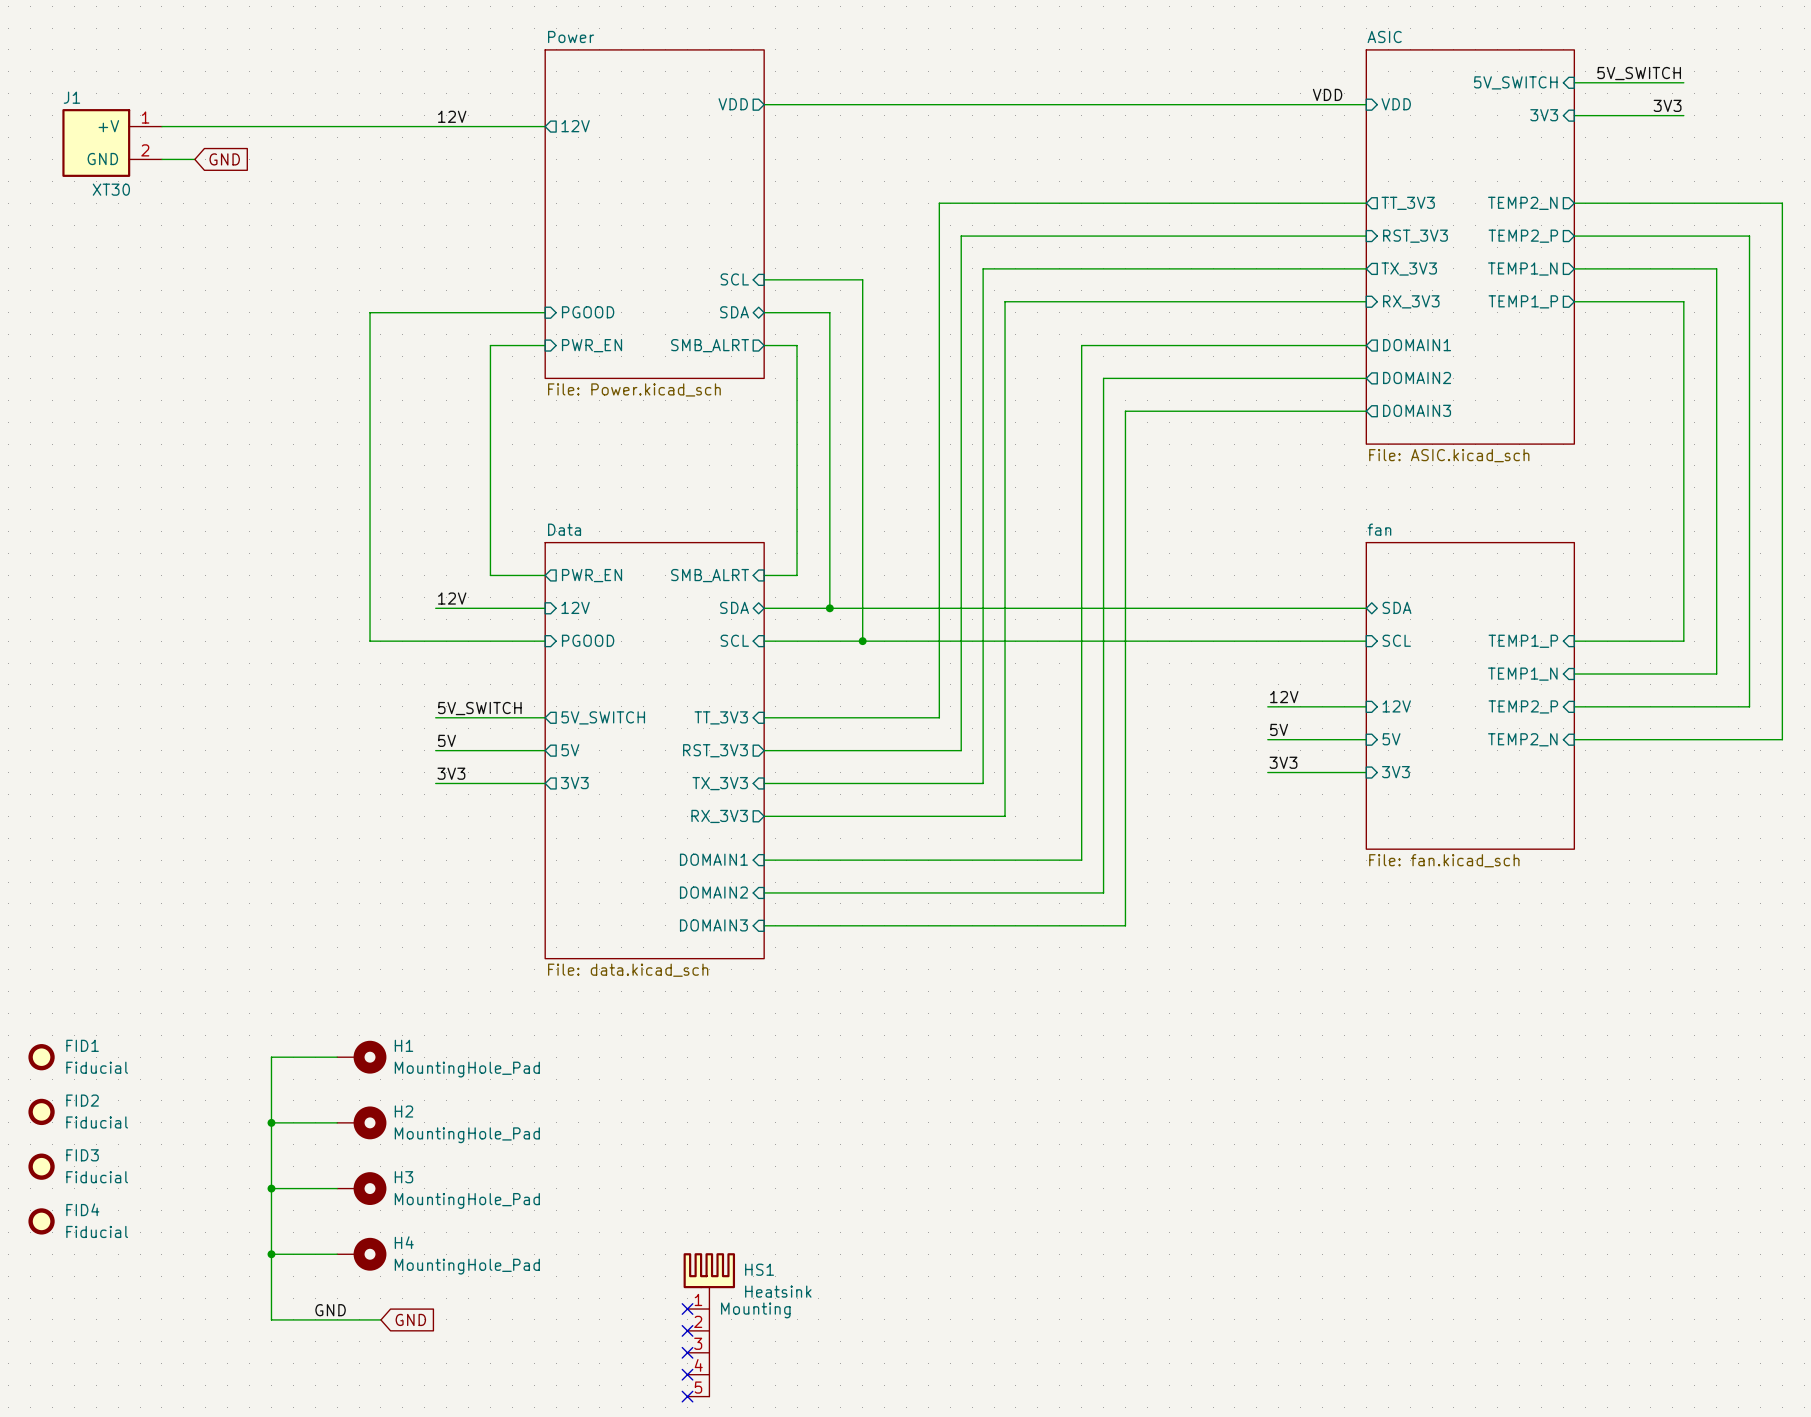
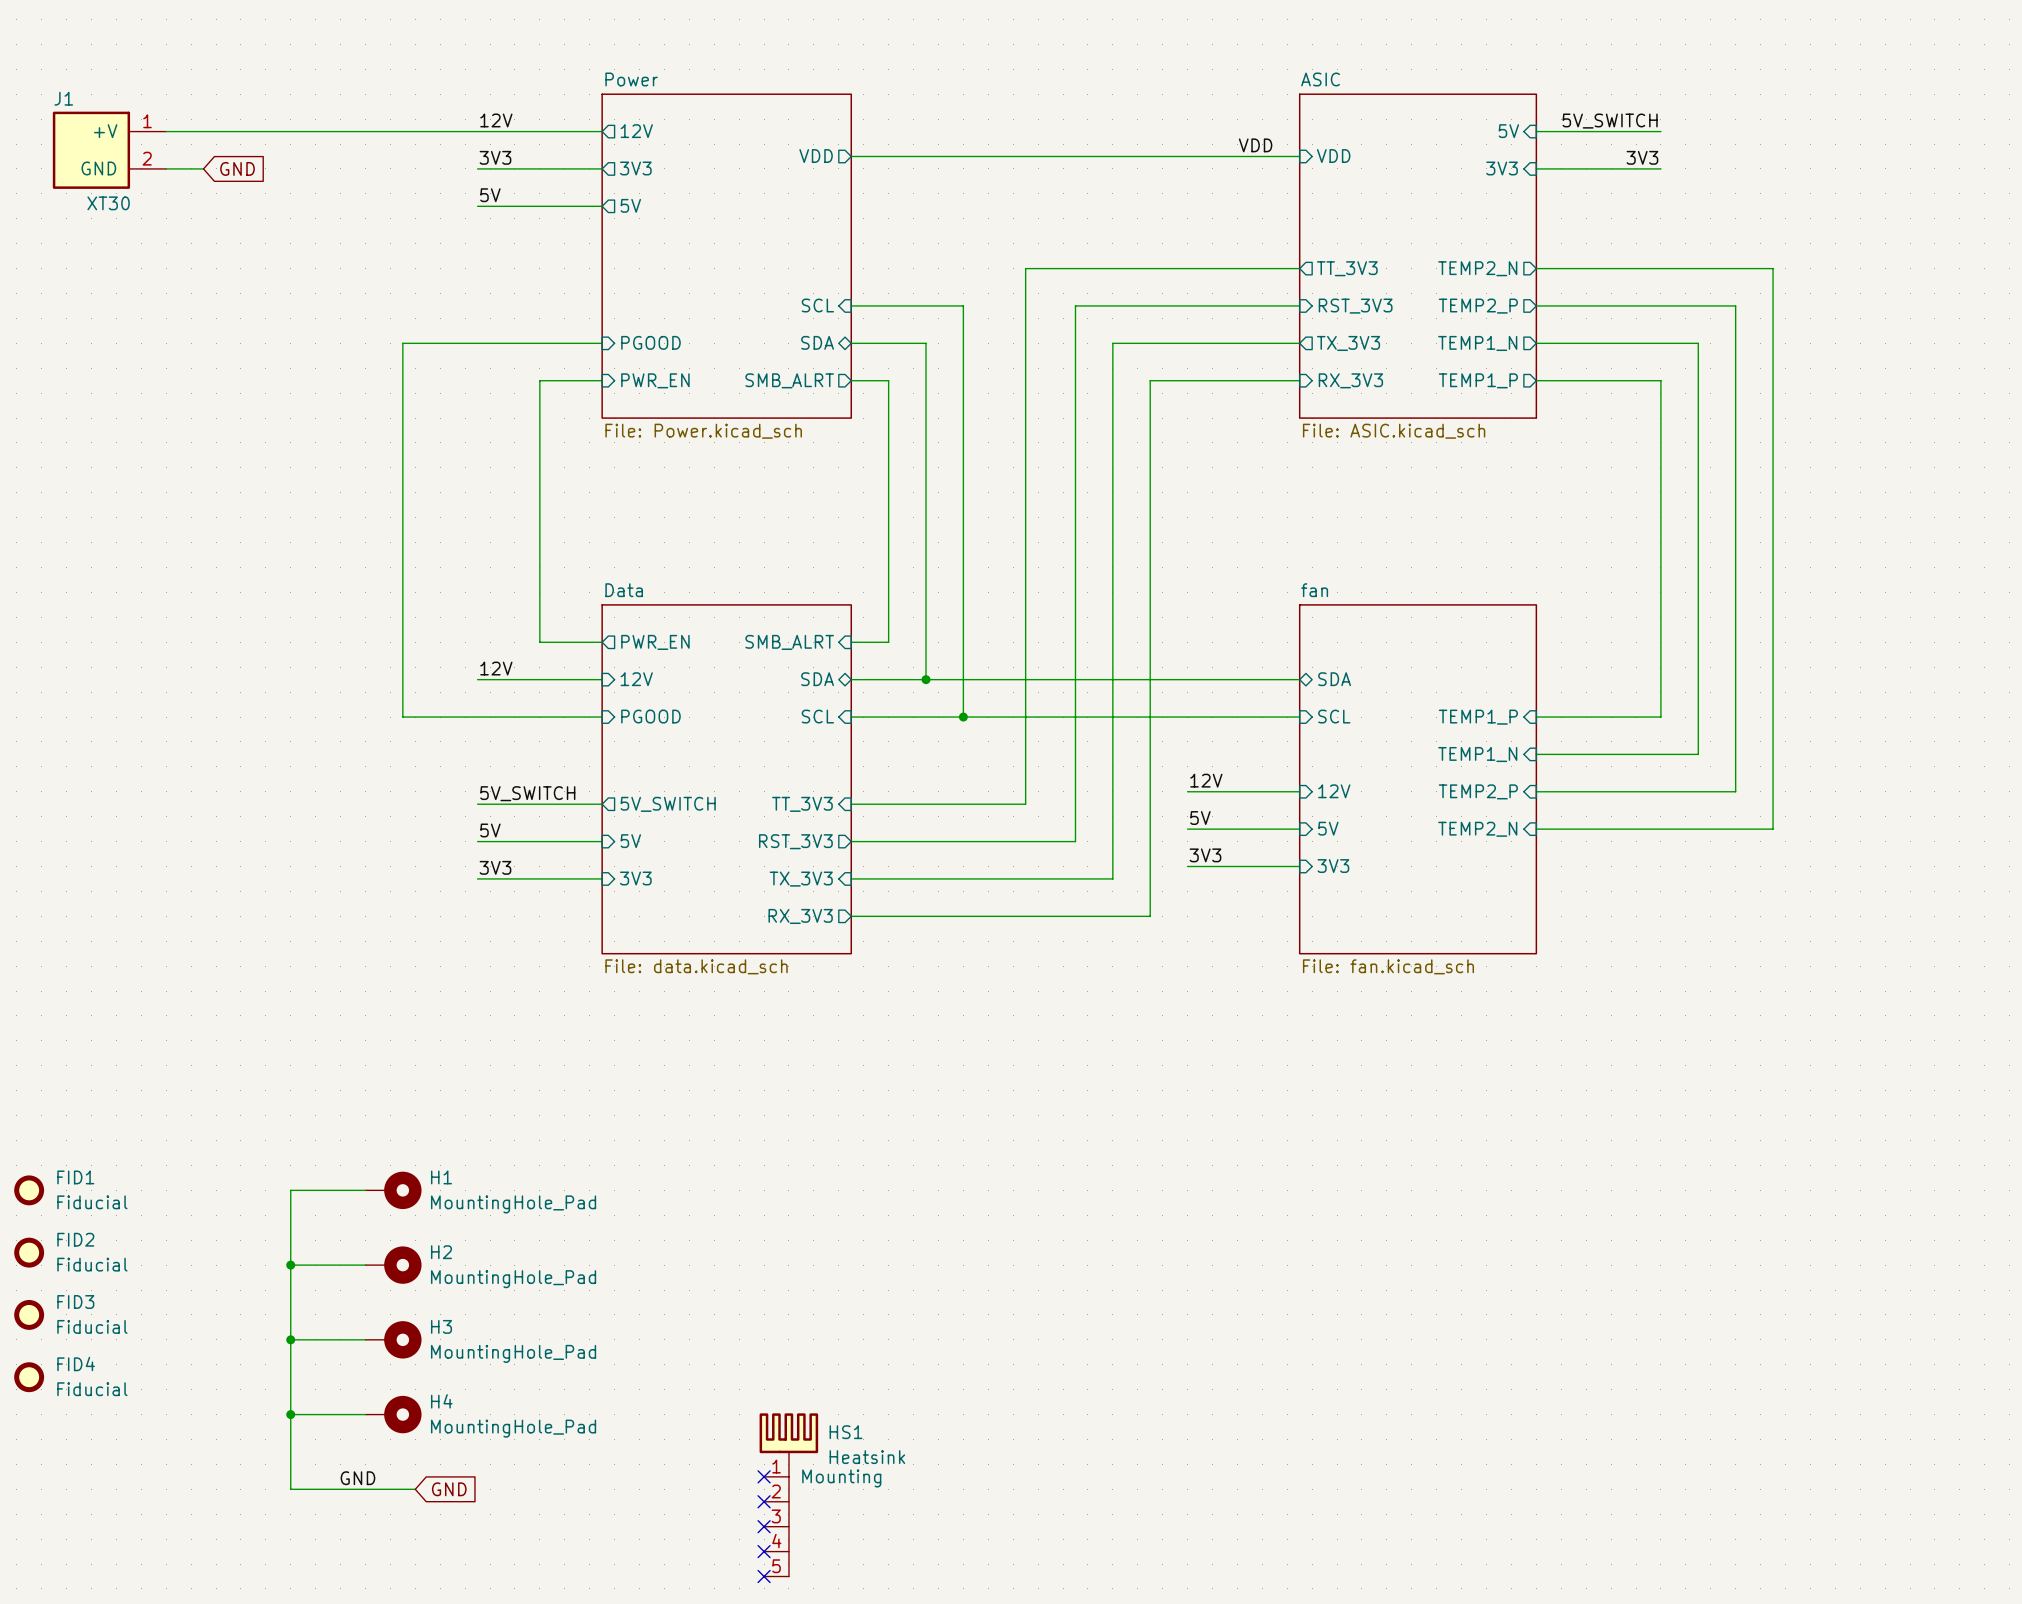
label position: 5V_SWITCH (1639, 73) -> 5V_SWITCH (1610, 121)
sheet pin: 5V_SWITCH (1515, 82) -> none
wire: (1574, 82) (1683, 82) -> (1536, 131) (1660, 131)
label position: VDD (1327, 94) -> VDD (1255, 145)
sheet pin position: VDD (733, 104) -> VDD (816, 156)
wire: (764, 104) (1366, 104) -> none
sheet pin: VDD (1396, 104) -> none
label position: 3V3 (1667, 105) -> 3V3 (1642, 157)
sheet pin position: 3V3 (1544, 115) -> 3V3 (1502, 168)
wire: (1574, 115) (1683, 115) -> (1536, 168) (1660, 168)
sheet pin: none -> 5V (1508, 131)
wire: none -> (851, 156) (1299, 156)
sheet pin: none -> VDD (1333, 156)
label: none -> 3V3 (495, 157)
wire: none -> (477, 168) (602, 168)
sheet pin: none -> 3V3 (635, 168)
label: none -> 5V (490, 195)
sheet pin: none -> 5V (630, 205)
wire: none -> (477, 206) (602, 206)
wire: (1366, 203) (939, 203) (939, 717) (917, 717) -> (1299, 268) (1025, 268) (1025, 804)
sheet pin position: TT_3V3 (1408, 203) -> TT_3V3 (1347, 268)
sheet pin position: TEMP2_N (1522, 203) -> TEMP2_N (1477, 268)
wire: (1574, 203) (1782, 203) (1782, 739) (1574, 739) -> none
sheet Power: File: Power.kicad_sch (654, 214) -> none
sheet Power: none -> File: Power.kicad_sch (726, 256)
sheet ASIC: none -> File: ASIC.kicad_sch (1418, 256)
wire: (1366, 236) (961, 236) (961, 279) -> (1299, 305) (1075, 305)
sheet pin position: RST_3V3 (1415, 236) -> RST_3V3 (1355, 306)
sheet pin position: TEMP2_P (1523, 236) -> TEMP2_P (1478, 306)
wire: (1574, 236) (1749, 236) (1749, 706) (1574, 706) -> none
sheet ASIC: File: ASIC.kicad_sch (1470, 247) -> none
wire: (1366, 268) (983, 268) (983, 783) -> (1299, 343) (1112, 343) (1112, 878) (1100, 878)
wire: (1574, 268) (1716, 268) (1716, 673) (1574, 673) -> none
sheet pin position: TX_3V3 (1409, 269) -> TX_3V3 (1348, 343)
sheet pin: TEMP1_N (1522, 269) -> none
wire: (1366, 301) (1005, 301) (1005, 816) -> none
sheet pin position: RX_3V3 (1411, 301) -> RX_3V3 (1350, 380)
sheet pin: TEMP1_P (1523, 301) -> none
wire: (1574, 301) (1683, 301) (1683, 641) (1574, 641) -> none
sheet pin: none -> TEMP1_N (1477, 343)
wire: none -> (1536, 343) (1698, 343) (1698, 754) (1536, 754)
wire: (1081, 345) (1081, 860) (764, 860) -> (1212, 380) (1150, 380) (1150, 916) (1125, 916)
wire: (1158, 345) (1366, 345) -> (1536, 717) (1660, 717) (1660, 380) (1536, 380)
sheet pin: none -> TEMP1_P (1478, 380)
sheet pin: DOMAIN1 (1417, 345) -> none
sheet pin: DOMAIN2 (1417, 377) -> none
wire: (1366, 378) (1103, 378) (1103, 892) (764, 892) -> none
sheet pin: DOMAIN3 (1417, 410) -> none
wire: (1366, 411) (1125, 411) (1125, 925) (764, 925) -> none
sheet pin position: SDA (1396, 607) -> SDA (1334, 679)
wire: (1158, 608) (1366, 608) -> none
sheet pin position: SCL (1396, 640) -> SCL (1334, 716)
wire: (1158, 641) (1366, 641) -> none
sheet pin: none -> TEMP1_P (1478, 717)
sheet pin: TEMP1_P (1523, 641) -> none
sheet pin position: TEMP1_N (1522, 674) -> TEMP1_N (1477, 754)
sheet Data: none -> File: data.kicad_sch (726, 779)
sheet fan position: (1470, 695) -> (1418, 779)
label position: 12V (1284, 697) -> 12V (1206, 780)
wire: none -> (1187, 791) (1299, 791)
wire: (1267, 706) (1366, 706) -> (1536, 305) (1735, 305) (1735, 791) (1536, 791)
sheet pin position: 12V (1396, 706) -> 12V (1334, 791)
sheet pin position: TEMP2_P (1523, 706) -> TEMP2_P (1478, 791)
label position: 5V (1279, 729) -> 5V (1200, 818)
wire: none -> (1187, 829) (1299, 829)
wire: (1267, 739) (1366, 739) -> (1536, 268) (1773, 268) (1773, 829) (1536, 829)
sheet pin position: 5V (1391, 739) -> 5V (1328, 828)
sheet pin position: TEMP2_N (1522, 739) -> TEMP2_N (1477, 829)
sheet pin shape: output (570, 750) -> input (630, 841)
sheet Data: File: data.kicad_sch (654, 750) -> none
label position: 3V3 (1283, 762) -> 3V3 (1205, 855)
wire: (1267, 772) (1366, 772) -> (1187, 866) (1299, 866)
sheet pin position: 3V3 (1395, 772) -> 3V3 (1333, 866)
sheet pin shape: output (574, 783) -> input (635, 878)
sheet pin: DOMAIN1 (713, 859) -> none
sheet pin: DOMAIN2 (713, 892) -> none
sheet pin: DOMAIN3 (713, 925) -> none

